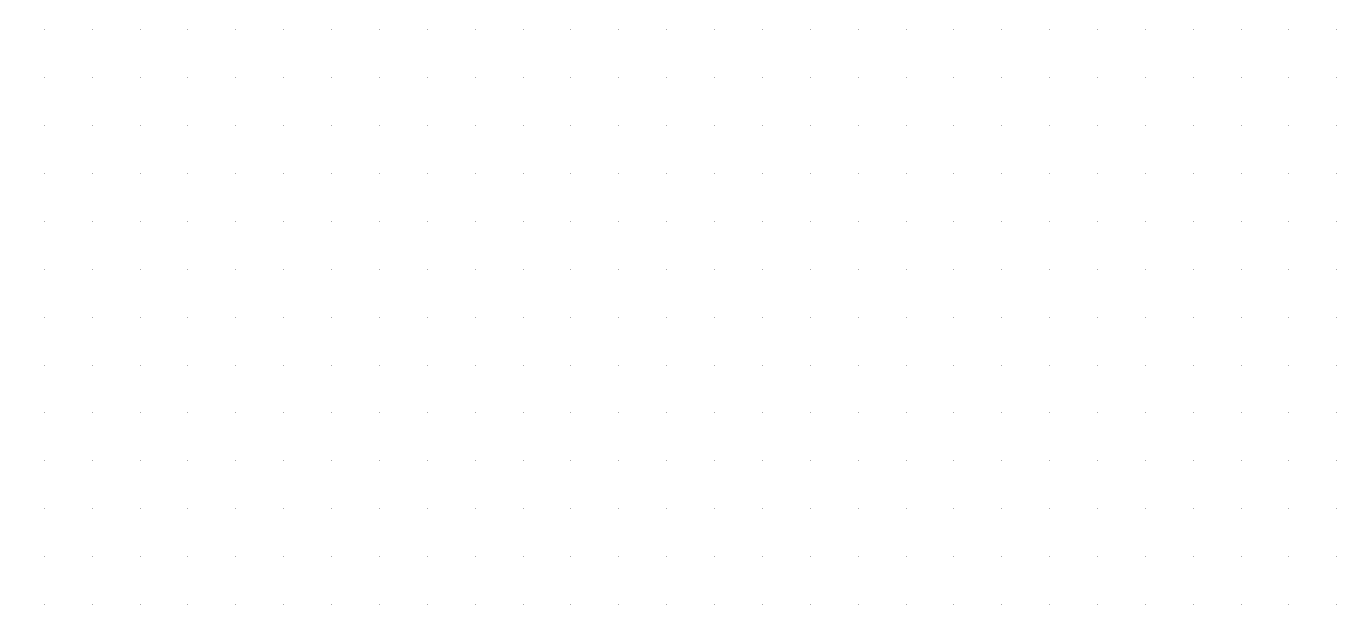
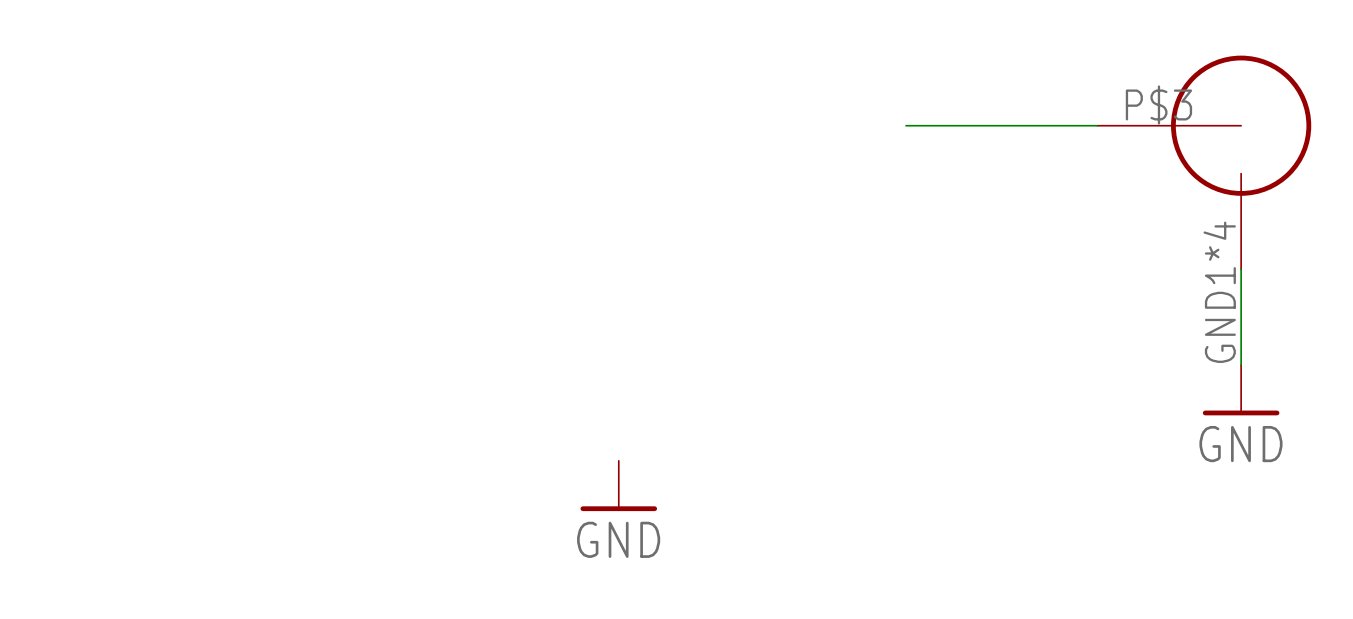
wire: none -> (906, 125) (1097, 125)
part: none -> (1204, 162)
wire: none -> (1241, 269) (1241, 365)
power symbol: none -> GND (1241, 390)
power symbol: none -> GND (618, 485)

